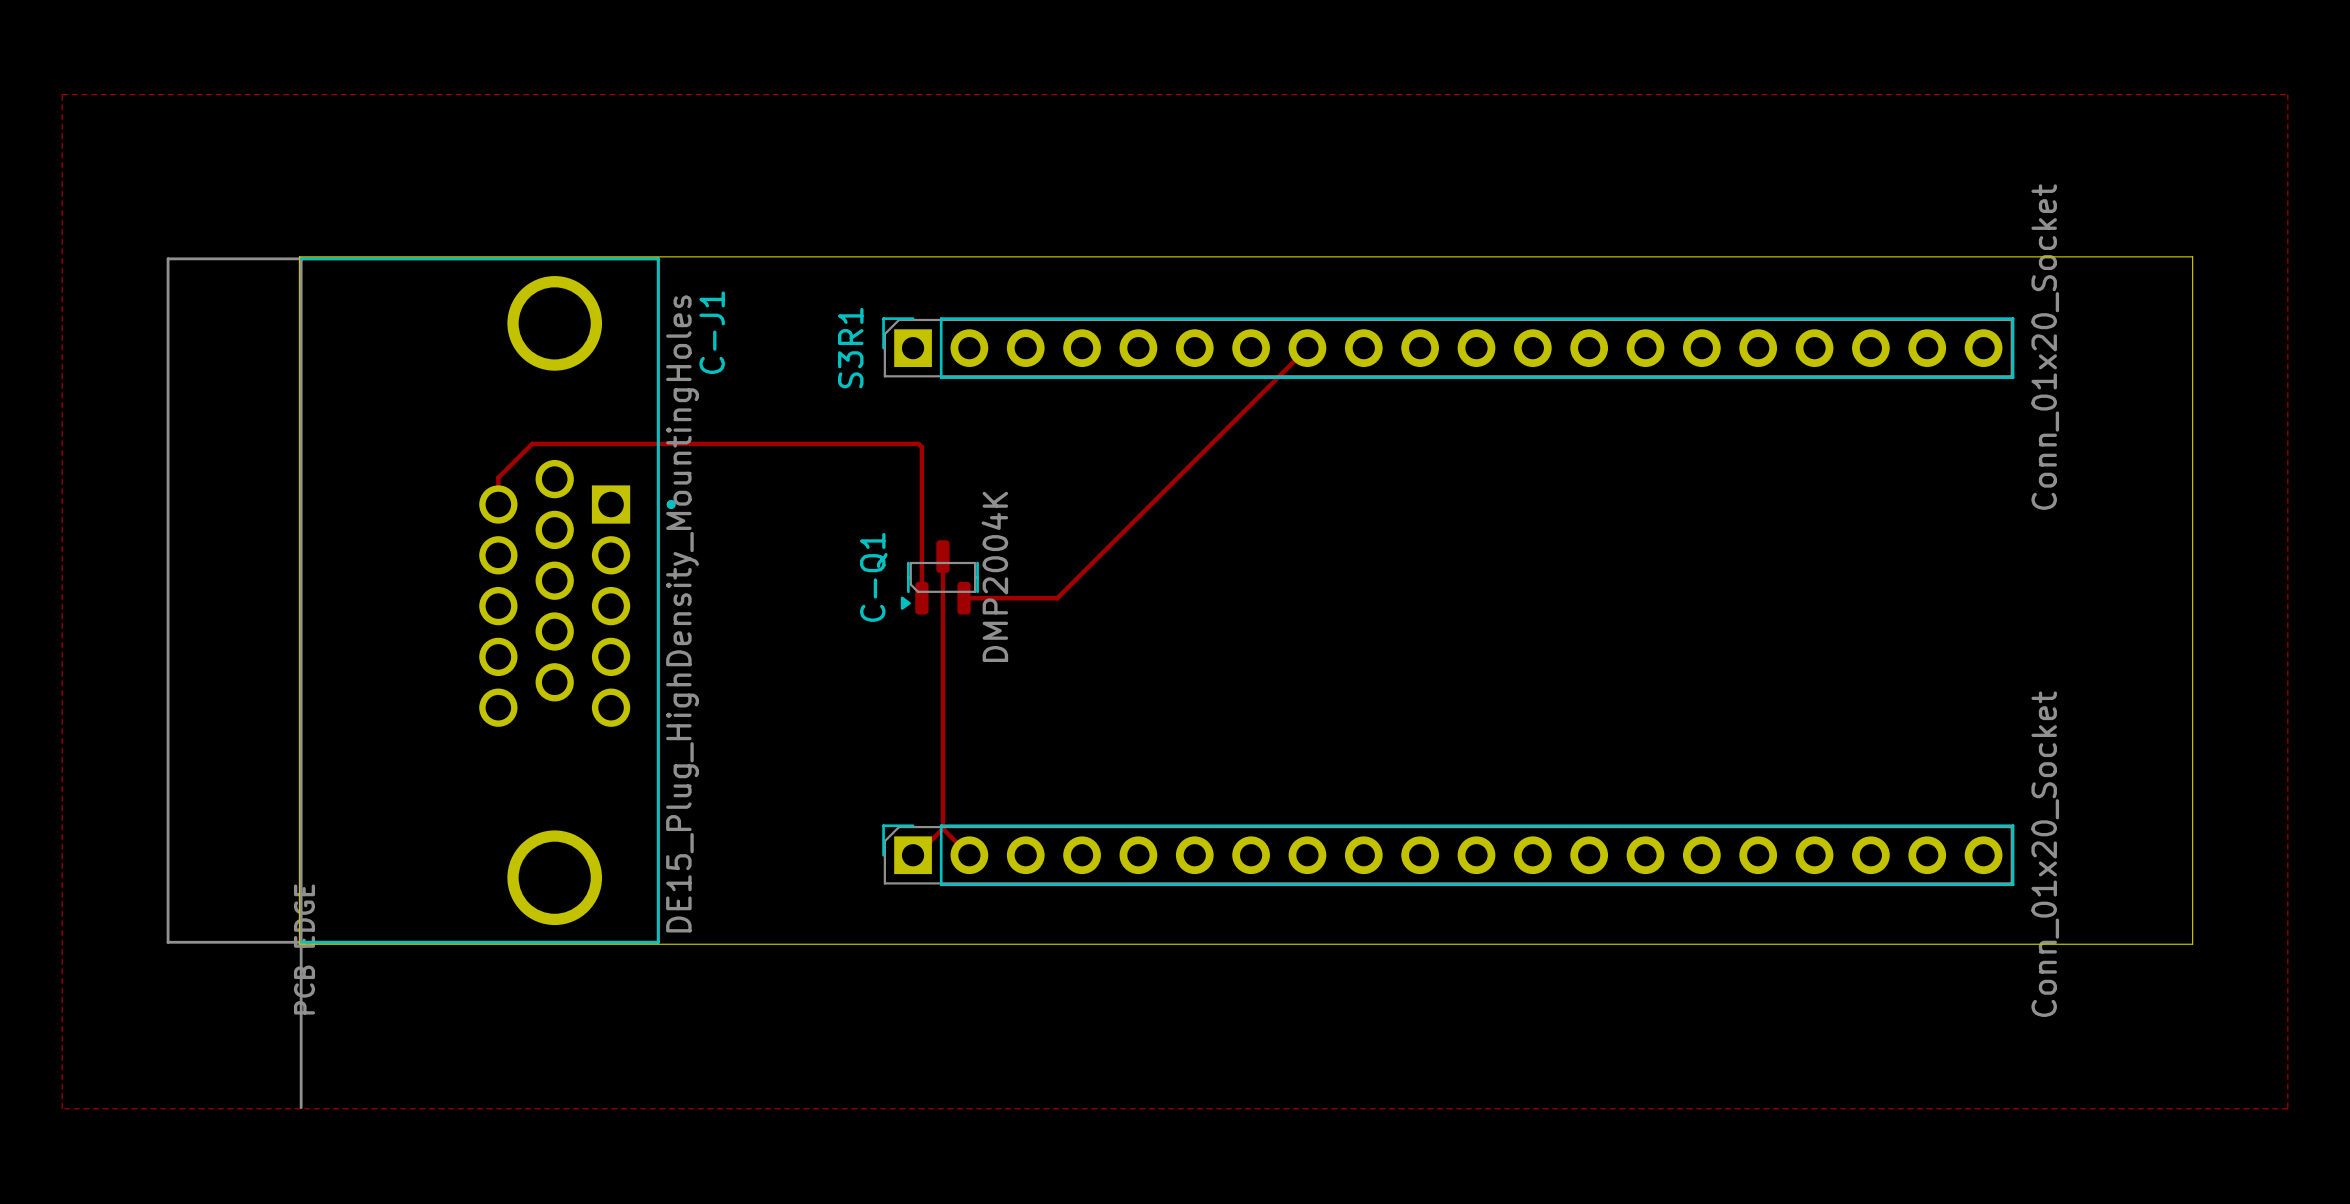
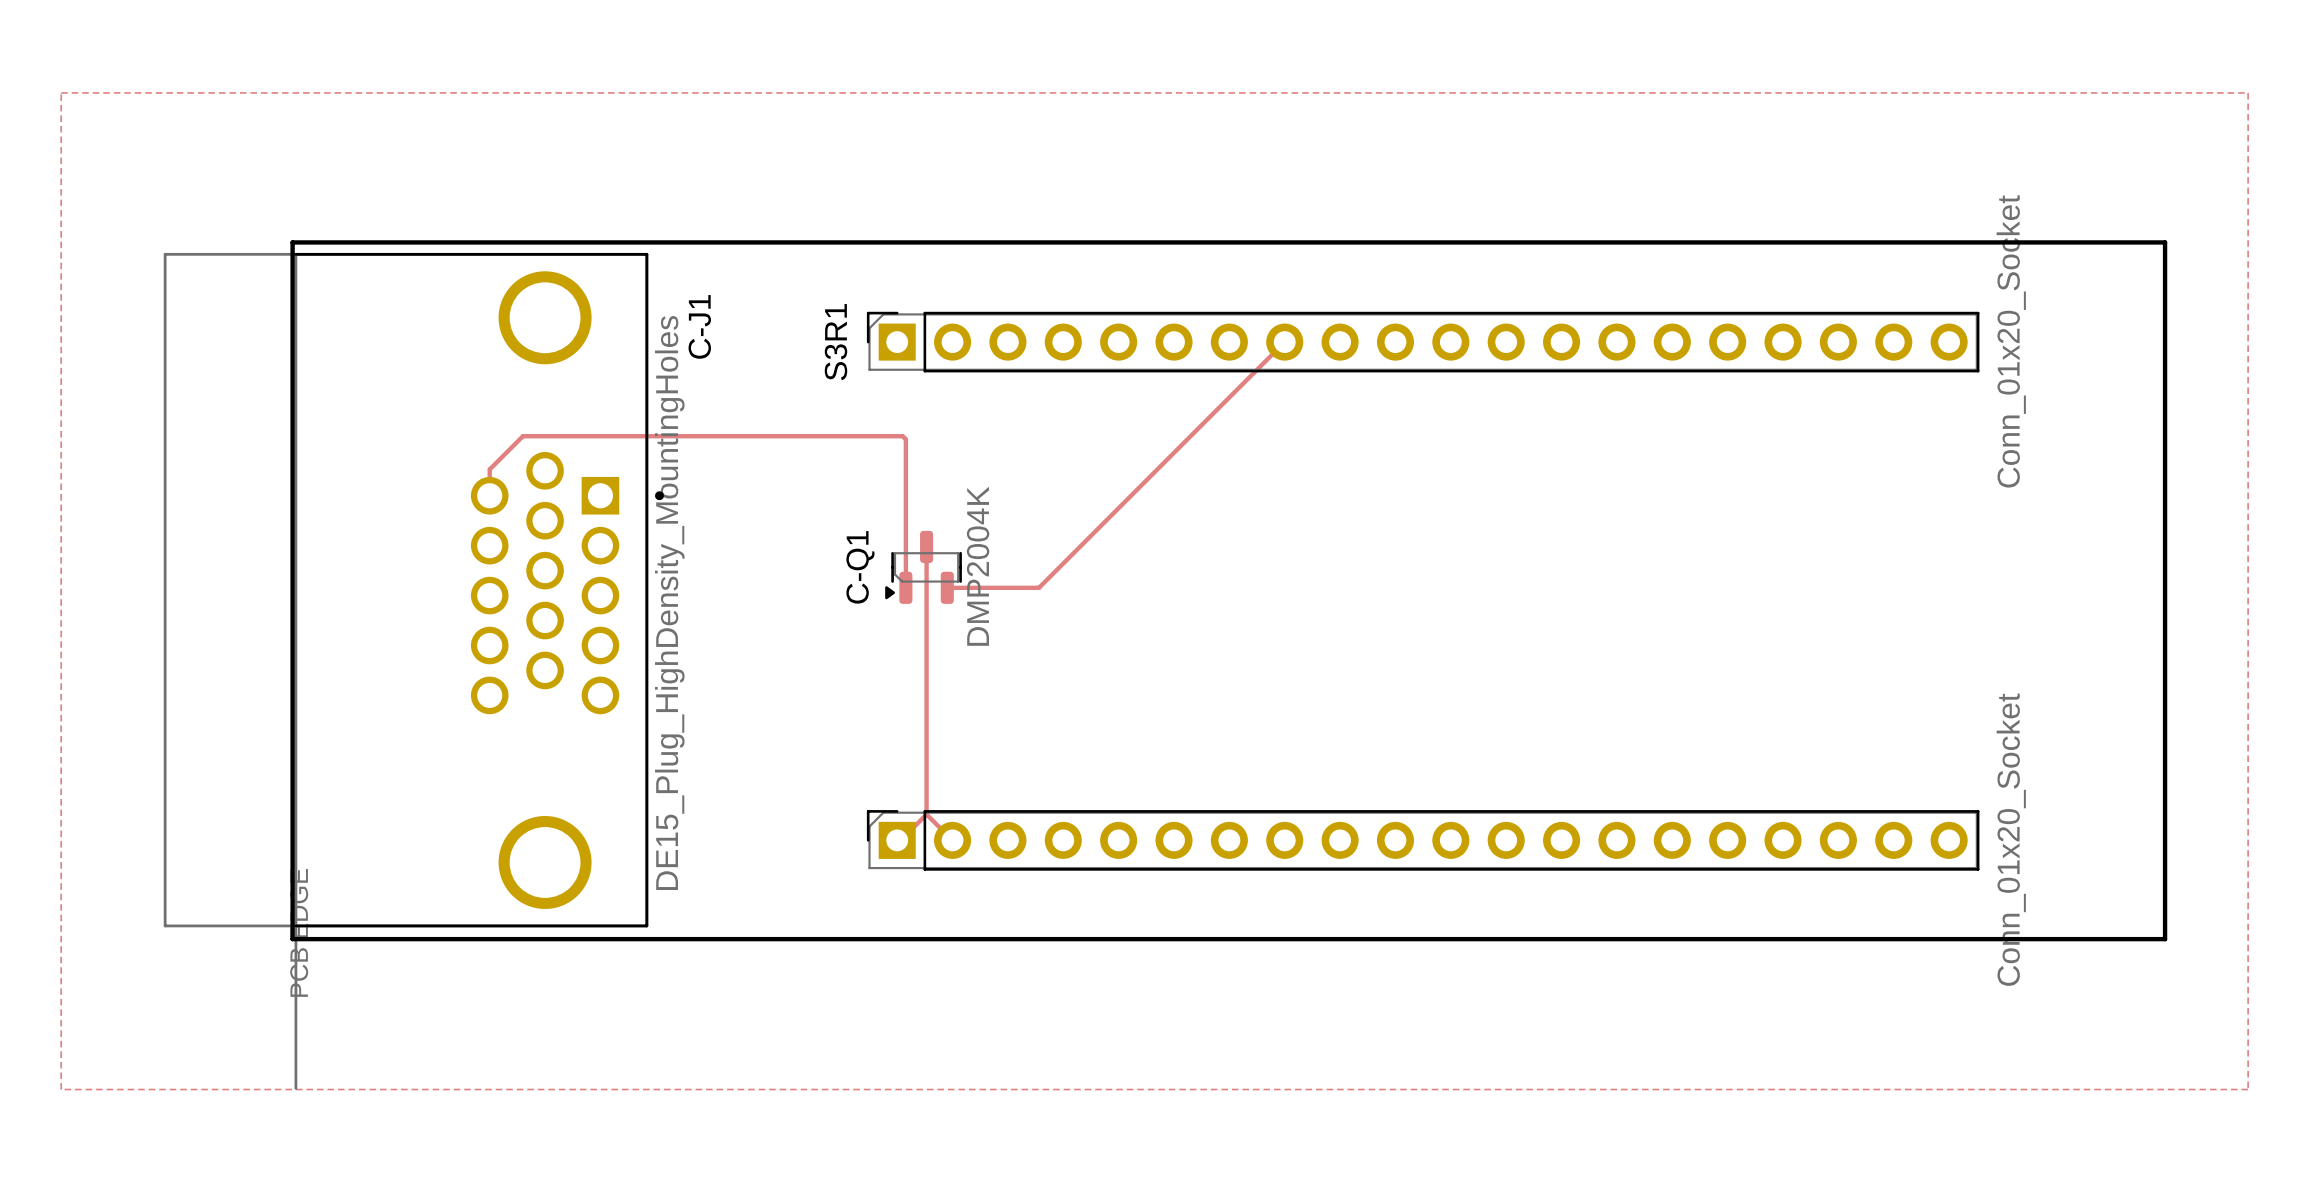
board edge: (299, 256) (2192, 256) (2192, 944) (299, 944) (299, 256) -> (292, 242) (292, 939) (2165, 939) (2165, 242) (292, 242)

